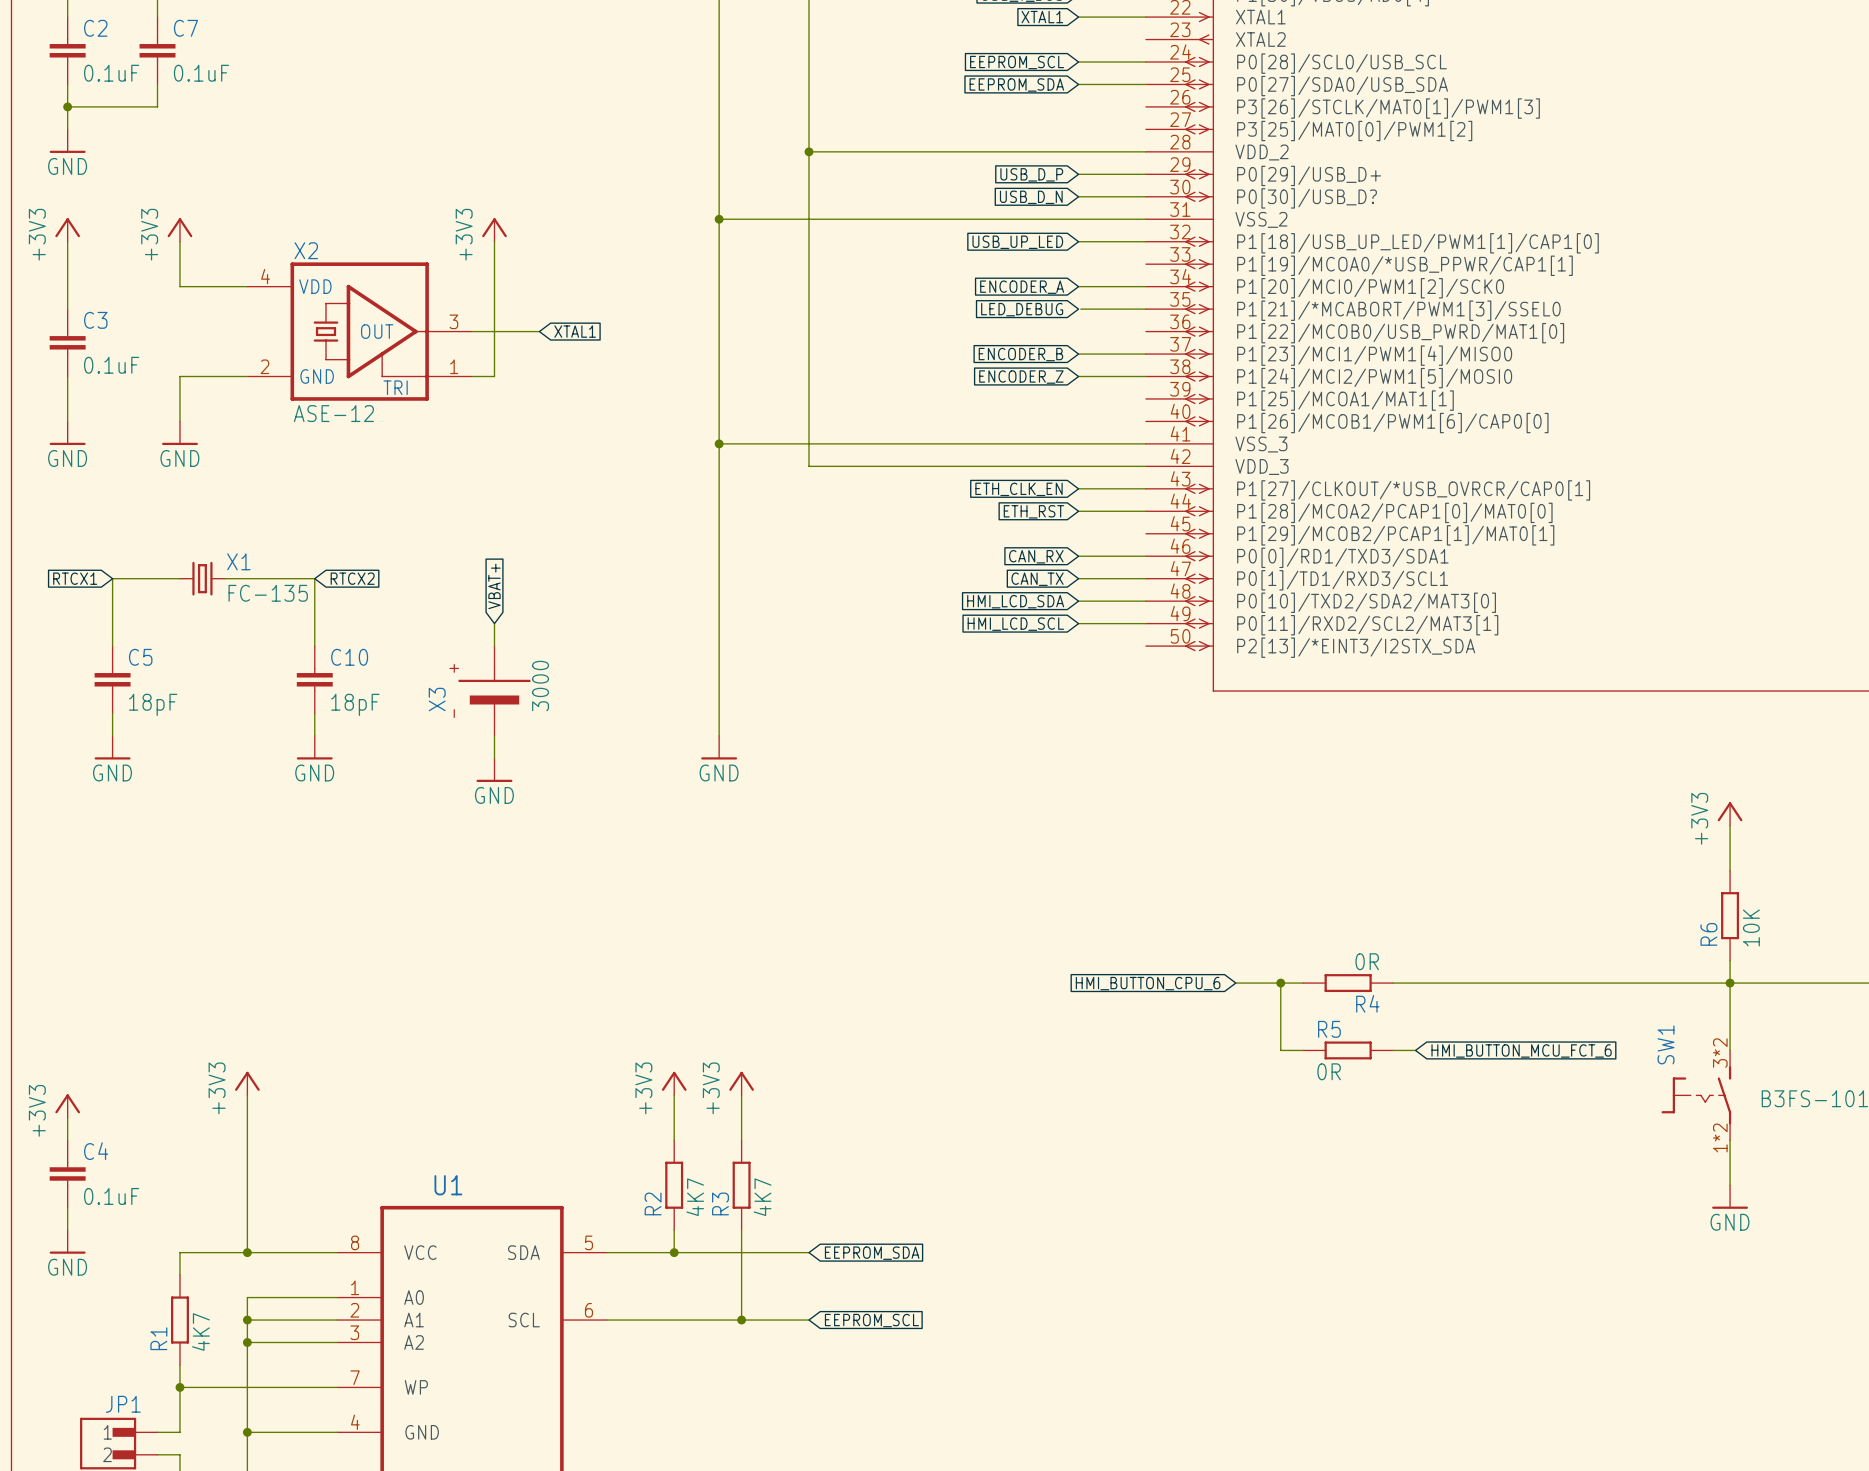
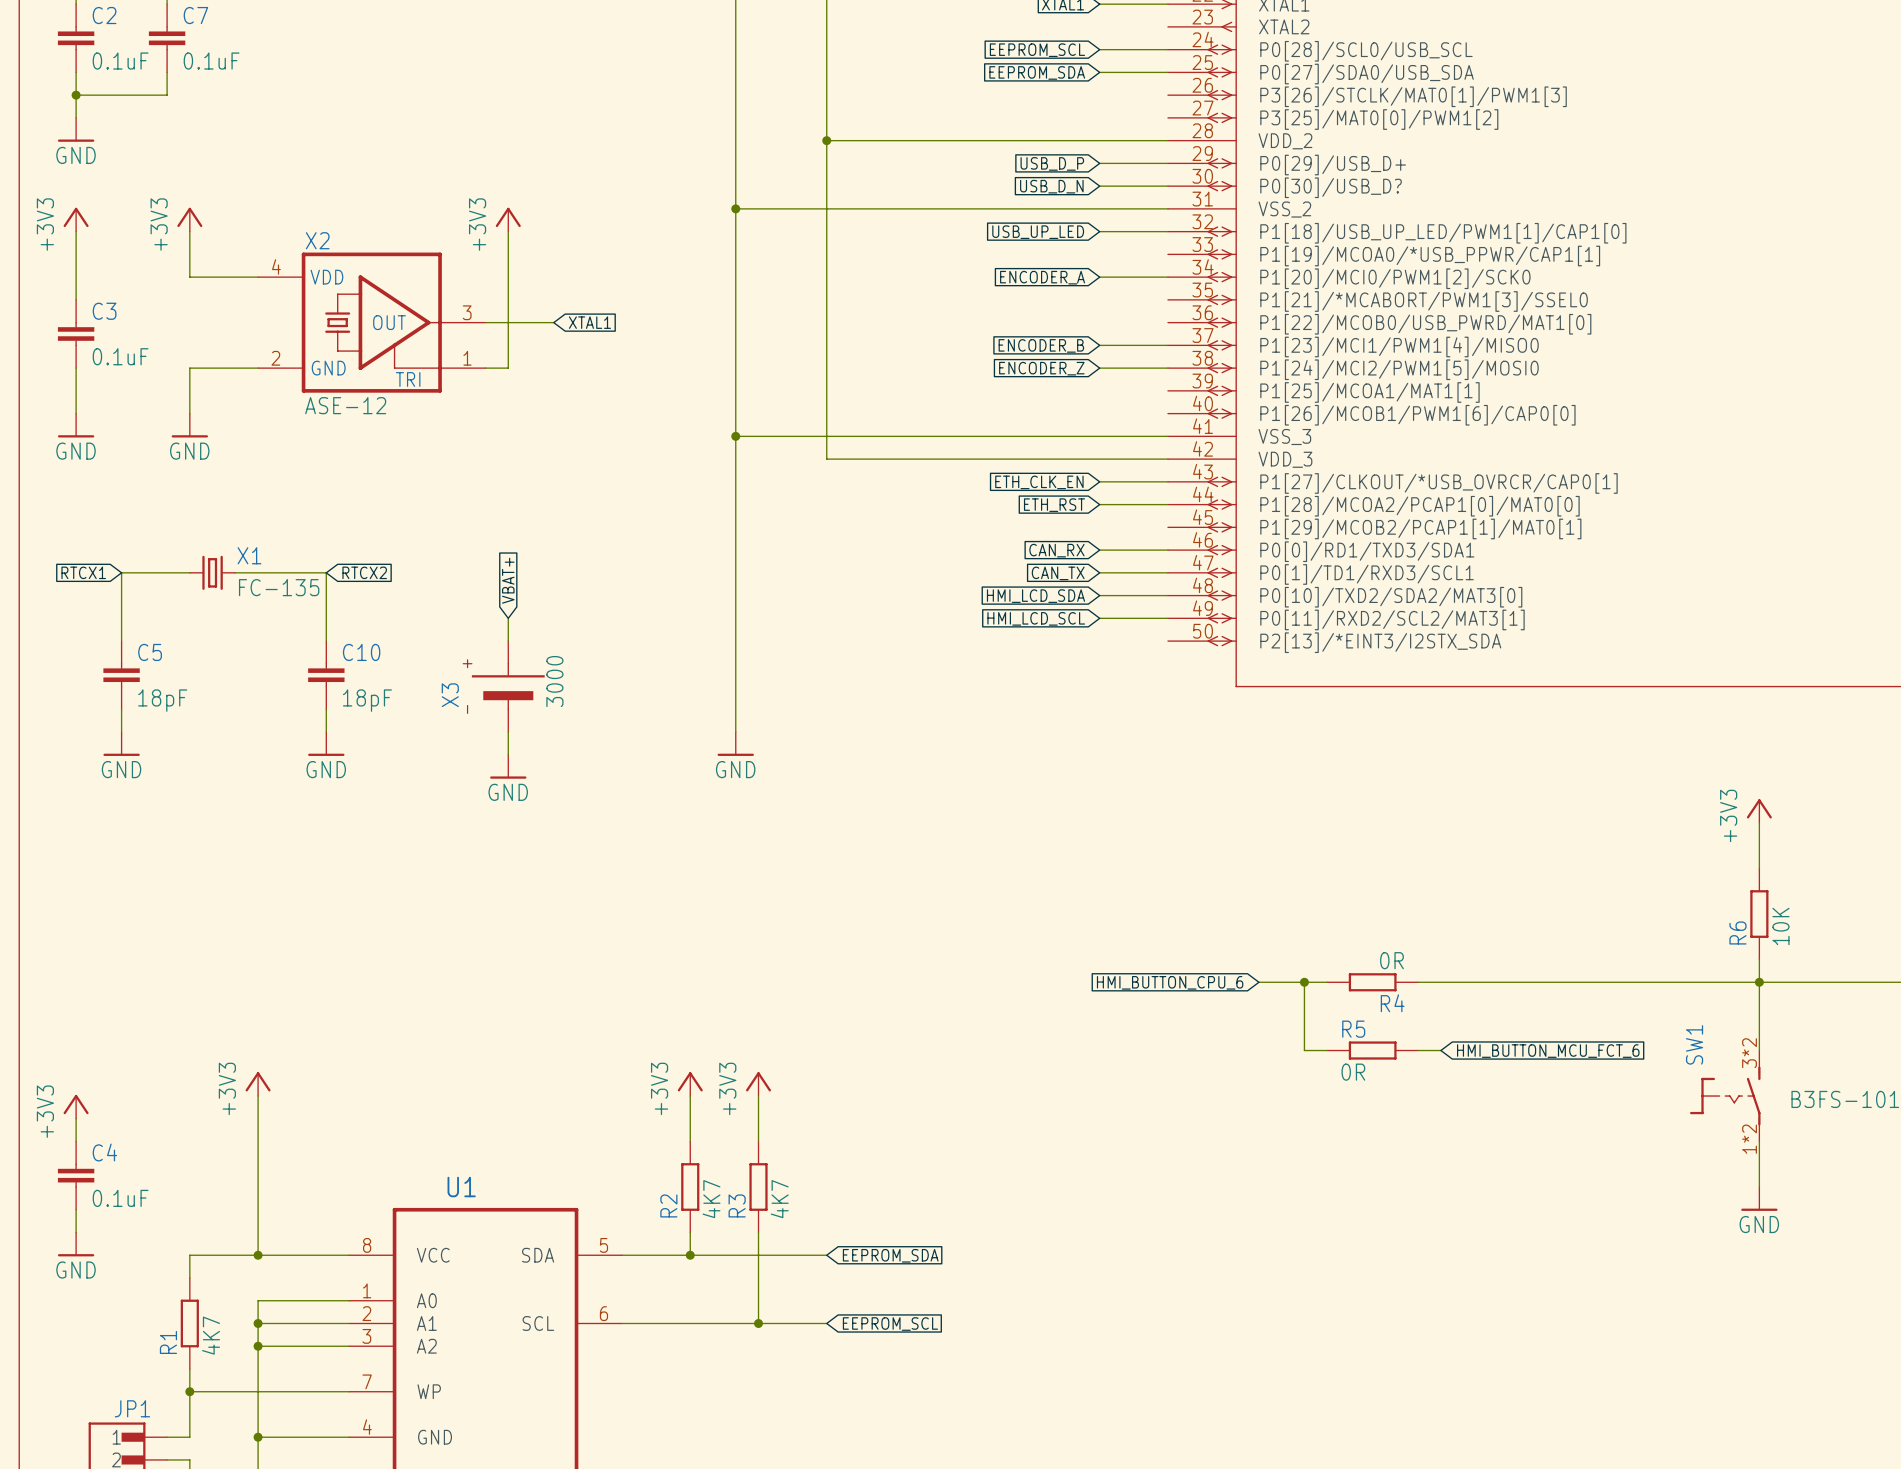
global label: LED_DEBUG (1022, 309) -> none
wire: (1080, 309) (1145, 309) -> none

